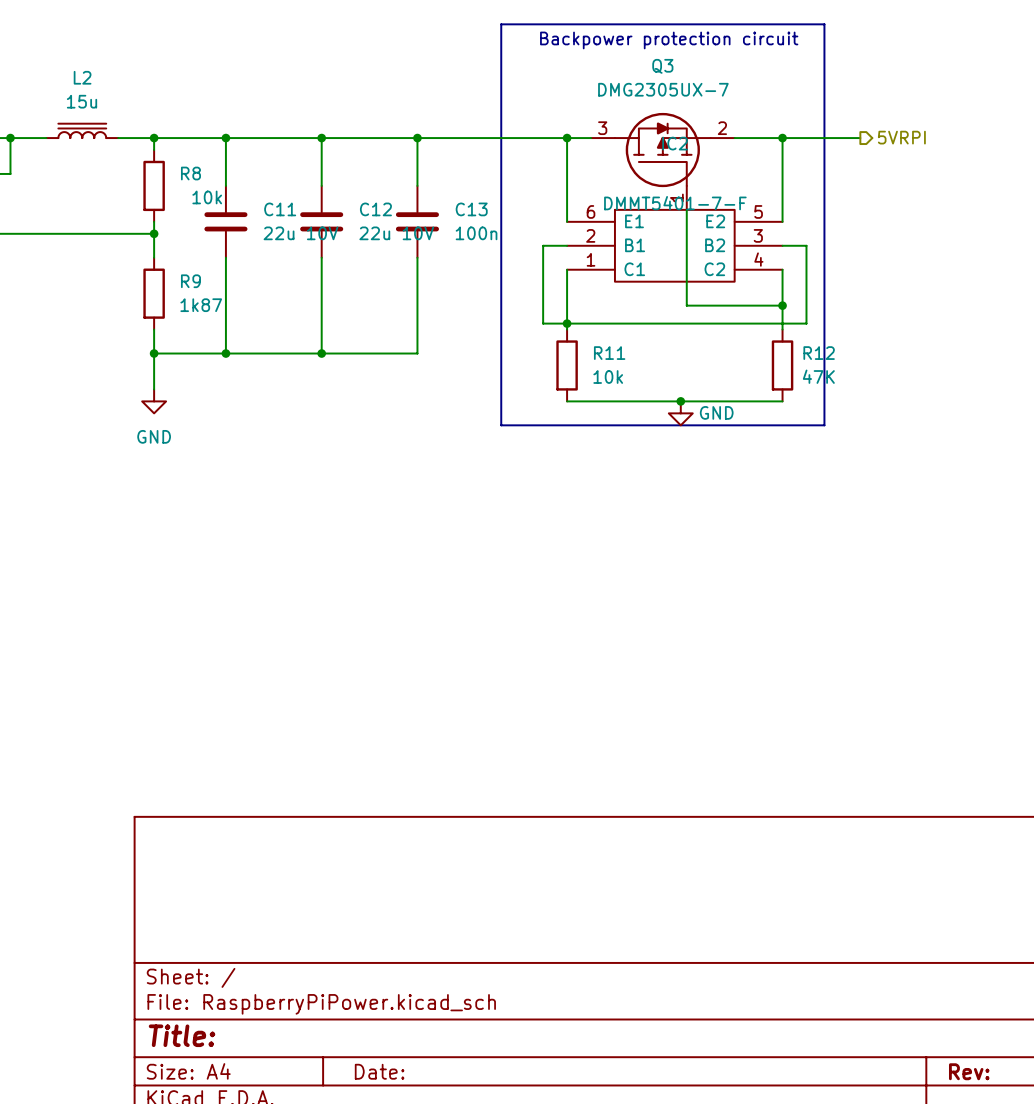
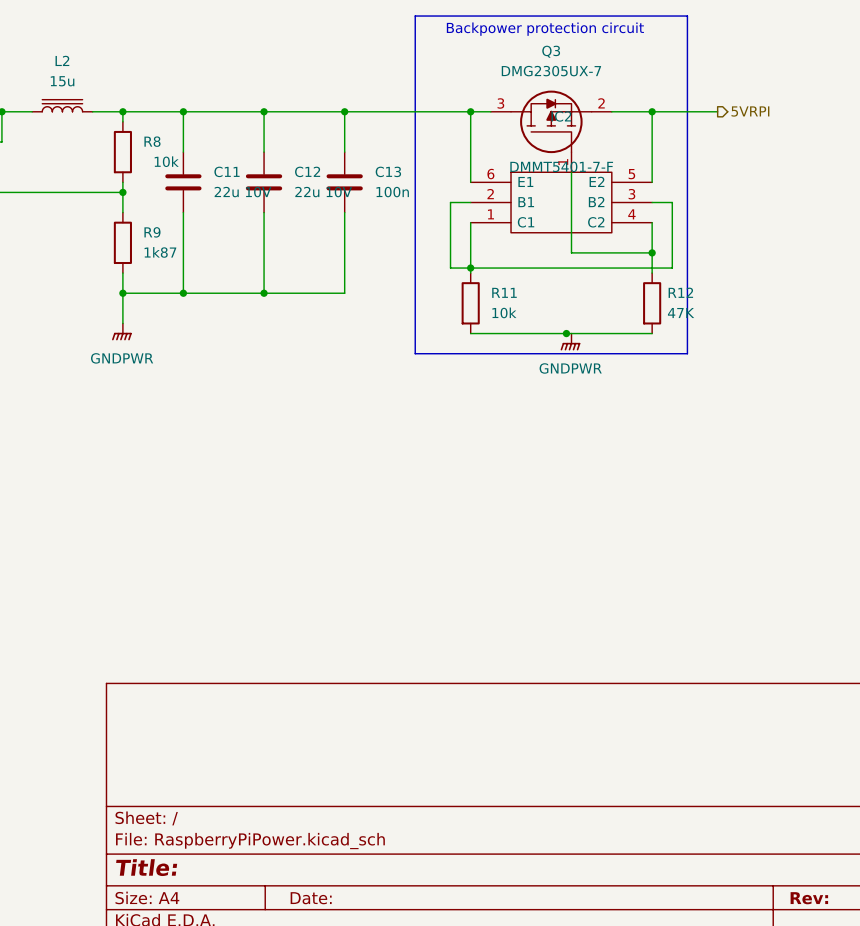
power symbol: GND (154, 401) -> GNDPWR (121, 331)
power symbol: GND (680, 413) -> GNDPWR (570, 342)

